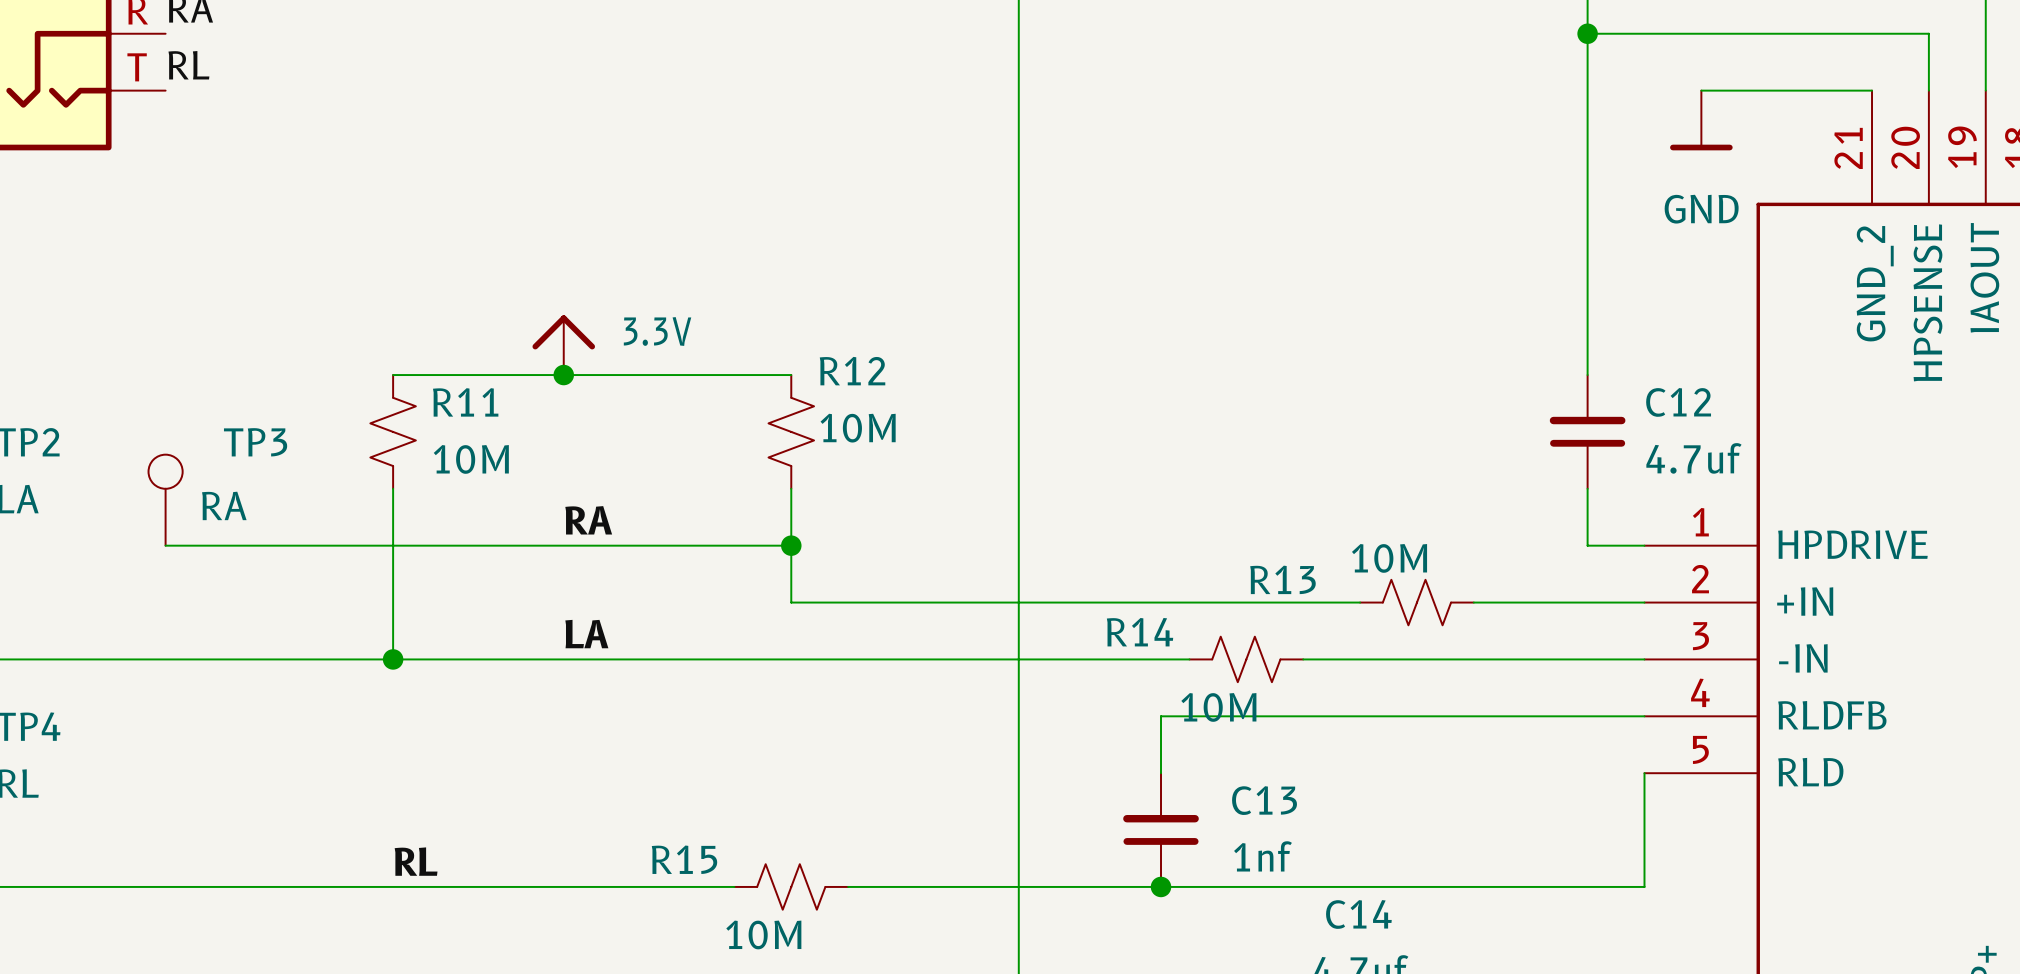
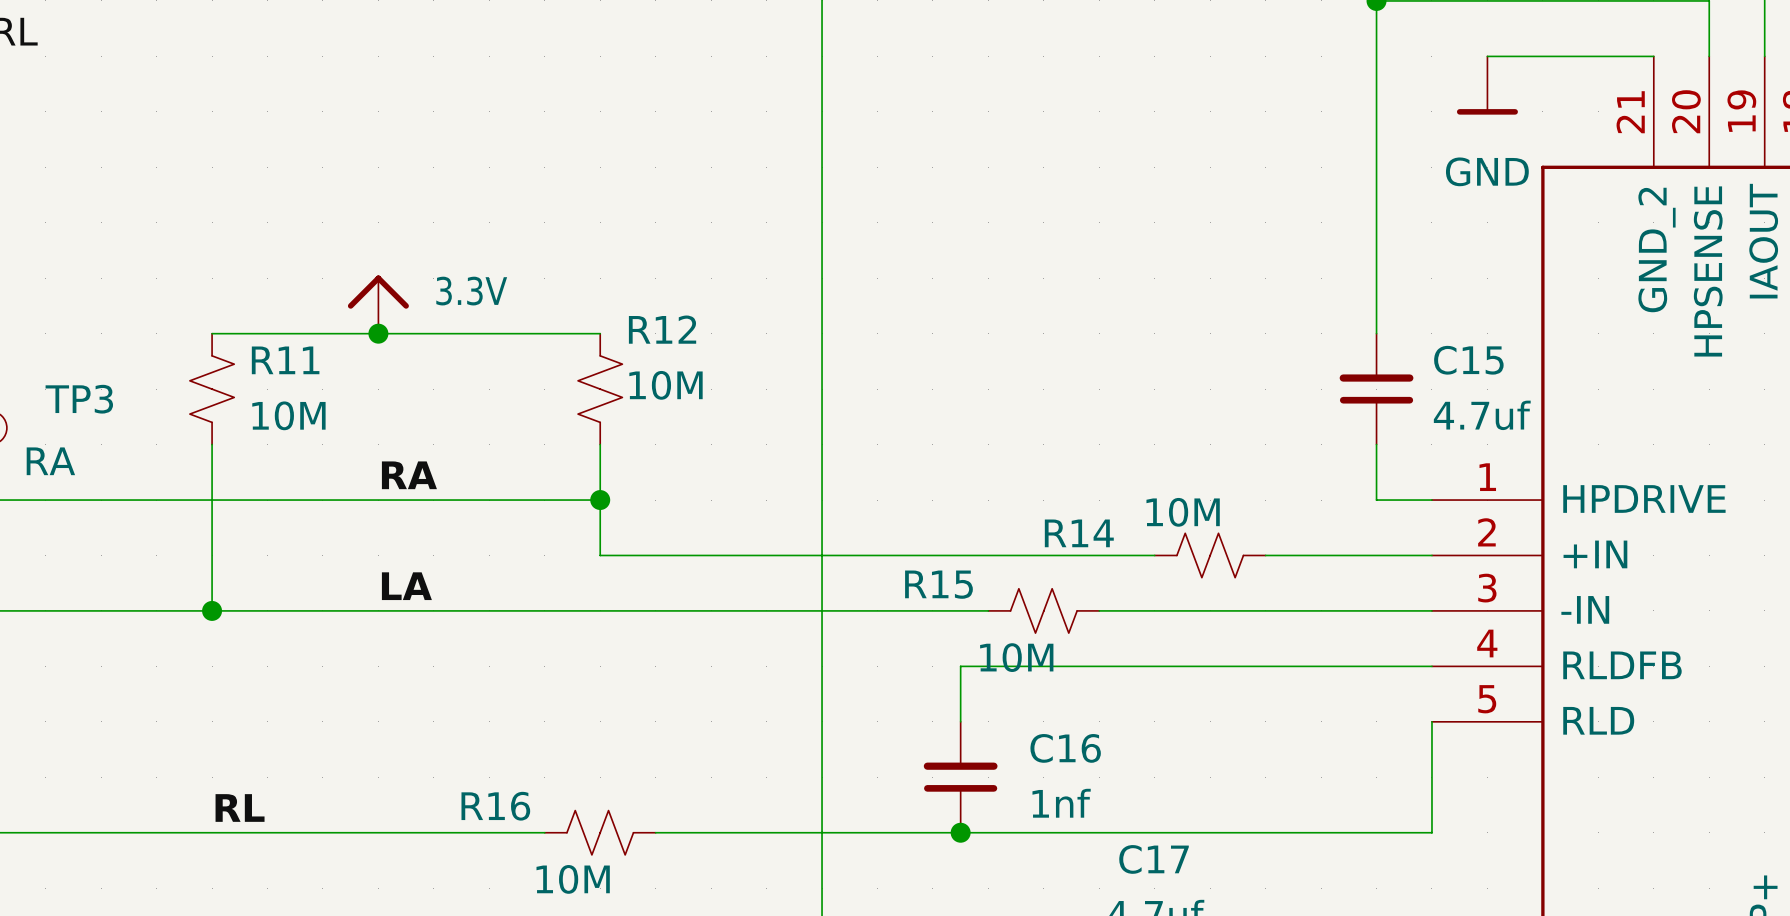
C12 name: C12 (1678, 402) -> C15 (1468, 360)
R13 name: R13 (1282, 579) -> R14 (1079, 533)
R14 name: R14 (1140, 632) -> R15 (938, 584)
C13 name: C13 (1264, 800) -> C16 (1065, 748)
R15 name: R15 (684, 859) -> R16 (495, 806)
C14 name: C14 (1358, 914) -> C17 (1154, 859)

